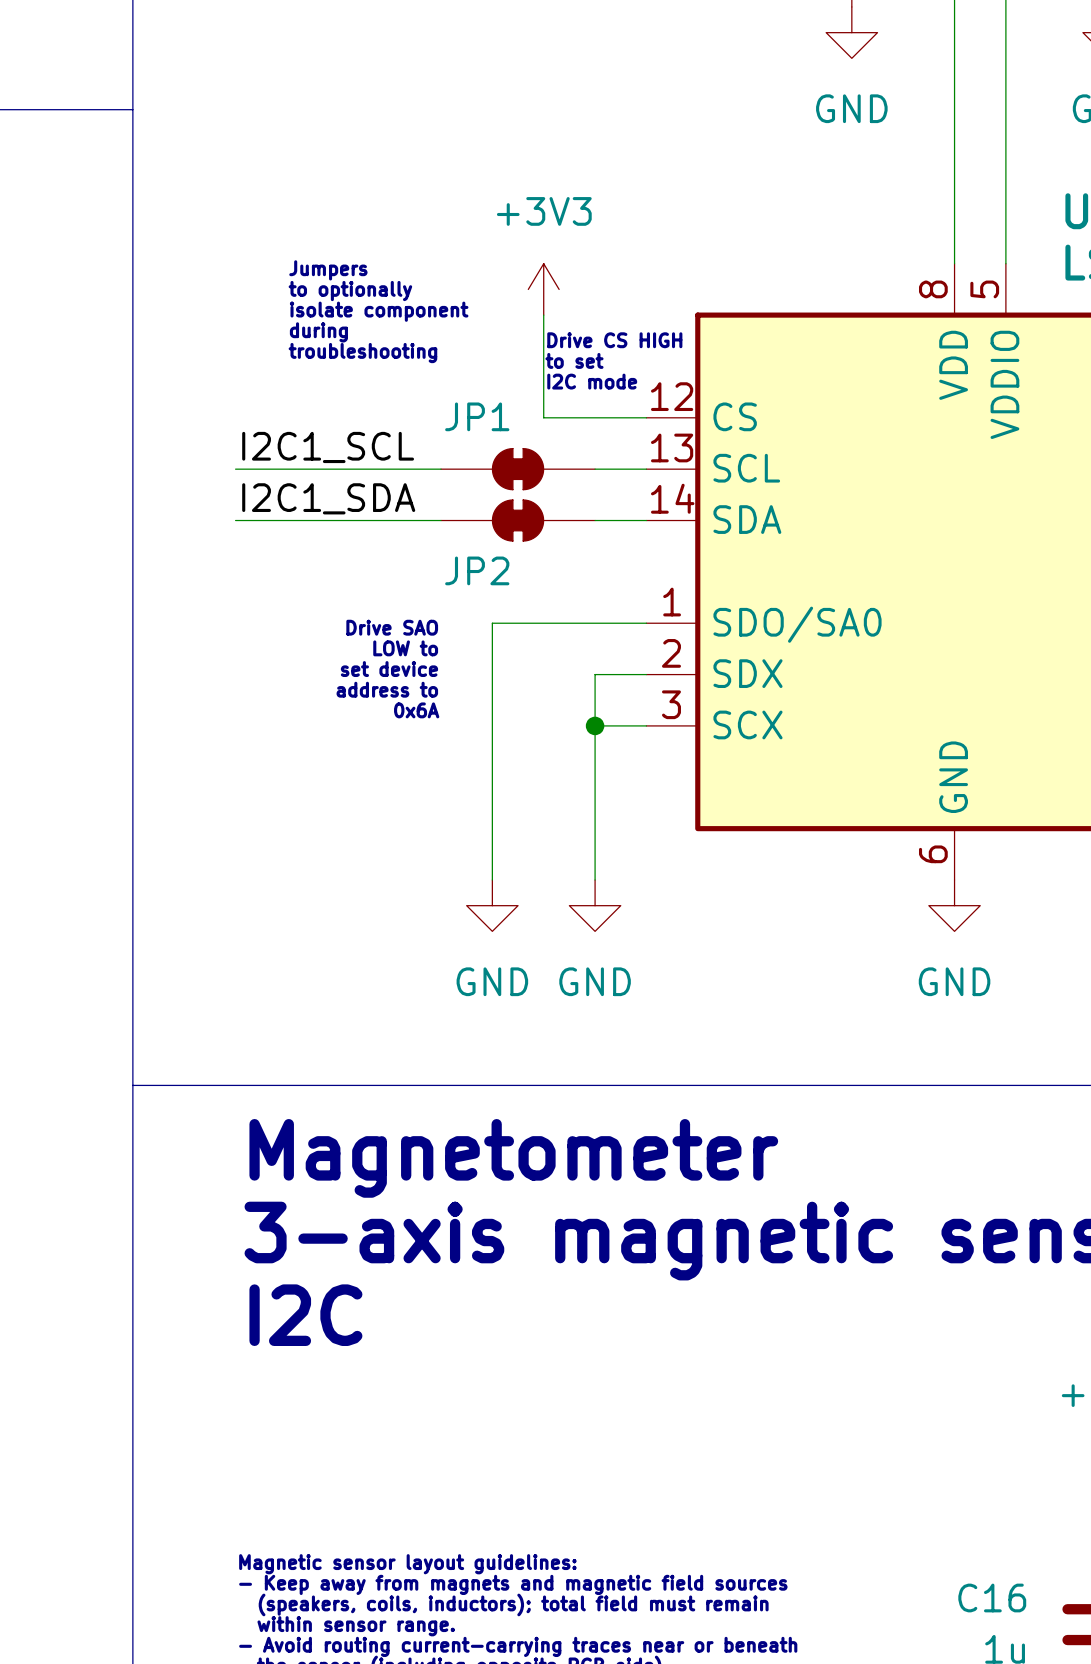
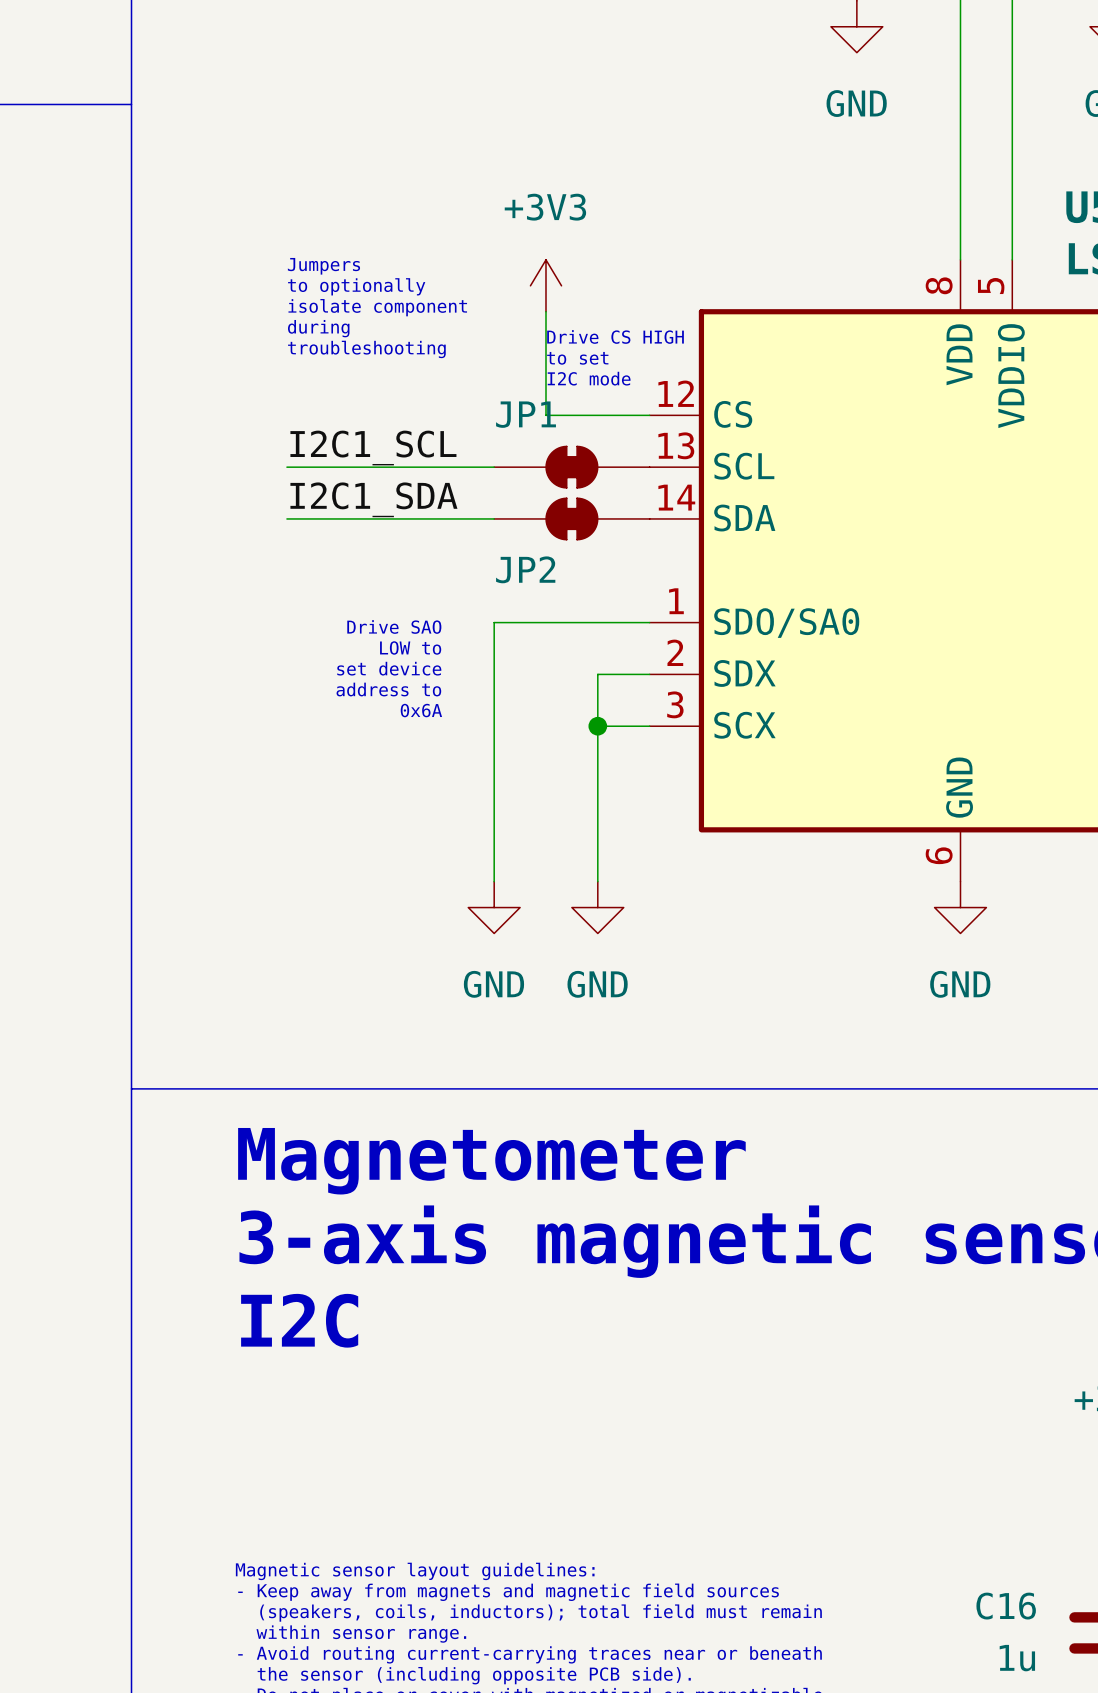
label position: I2C1_SCL (328, 447) -> I2C1_SCL (373, 448)
wire: (235, 469) (286, 469) -> none
JP1 position: (518, 469) -> (571, 467)
label position: I2C1_SDA (328, 498) -> I2C1_SDA (373, 499)
wire: (235, 520) (286, 520) -> none
JP2 position: (518, 520) -> (571, 518)

